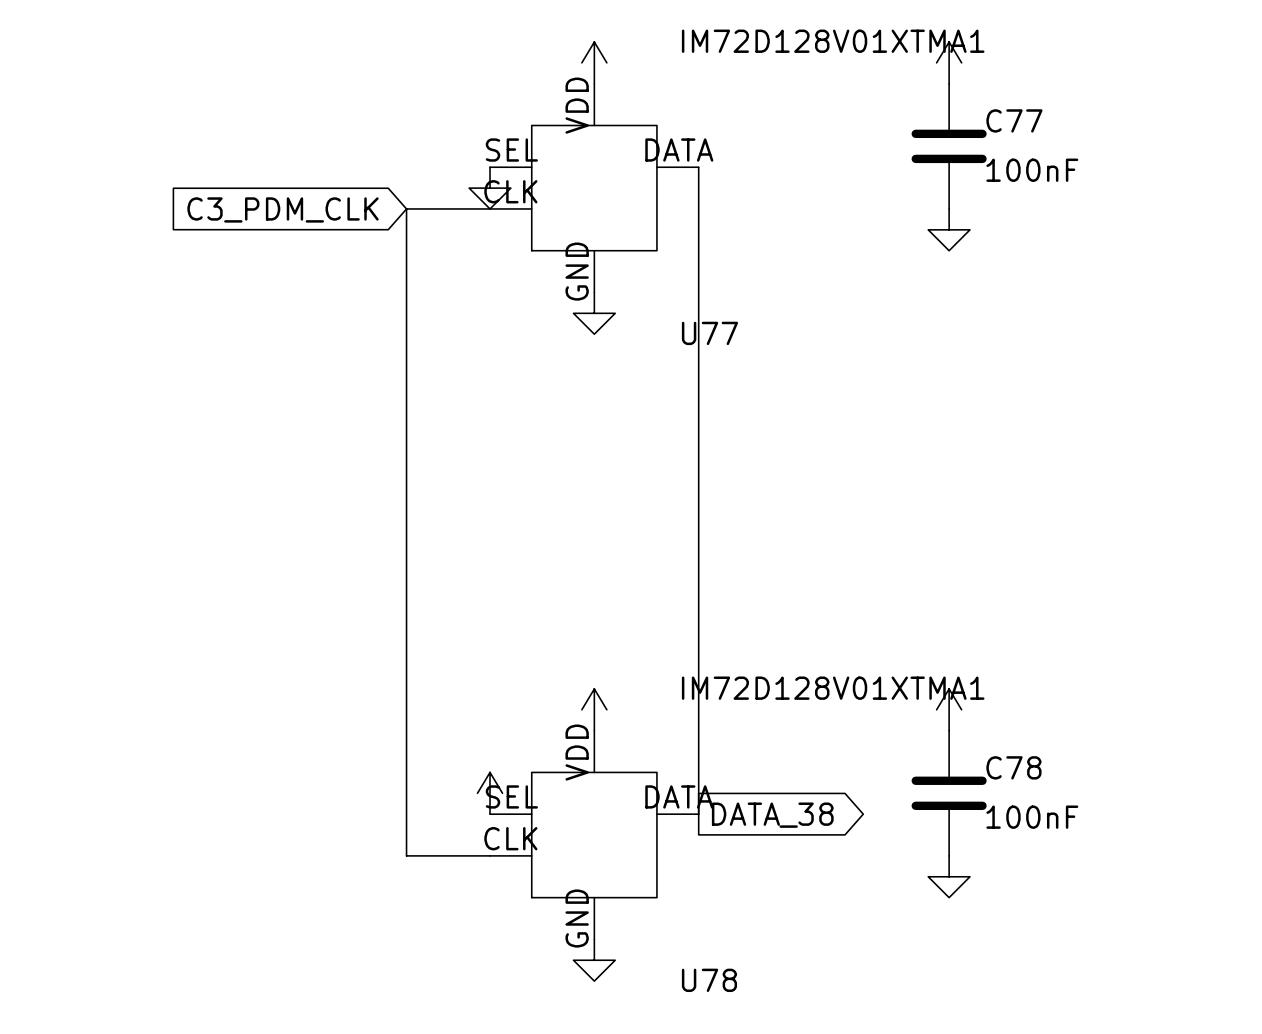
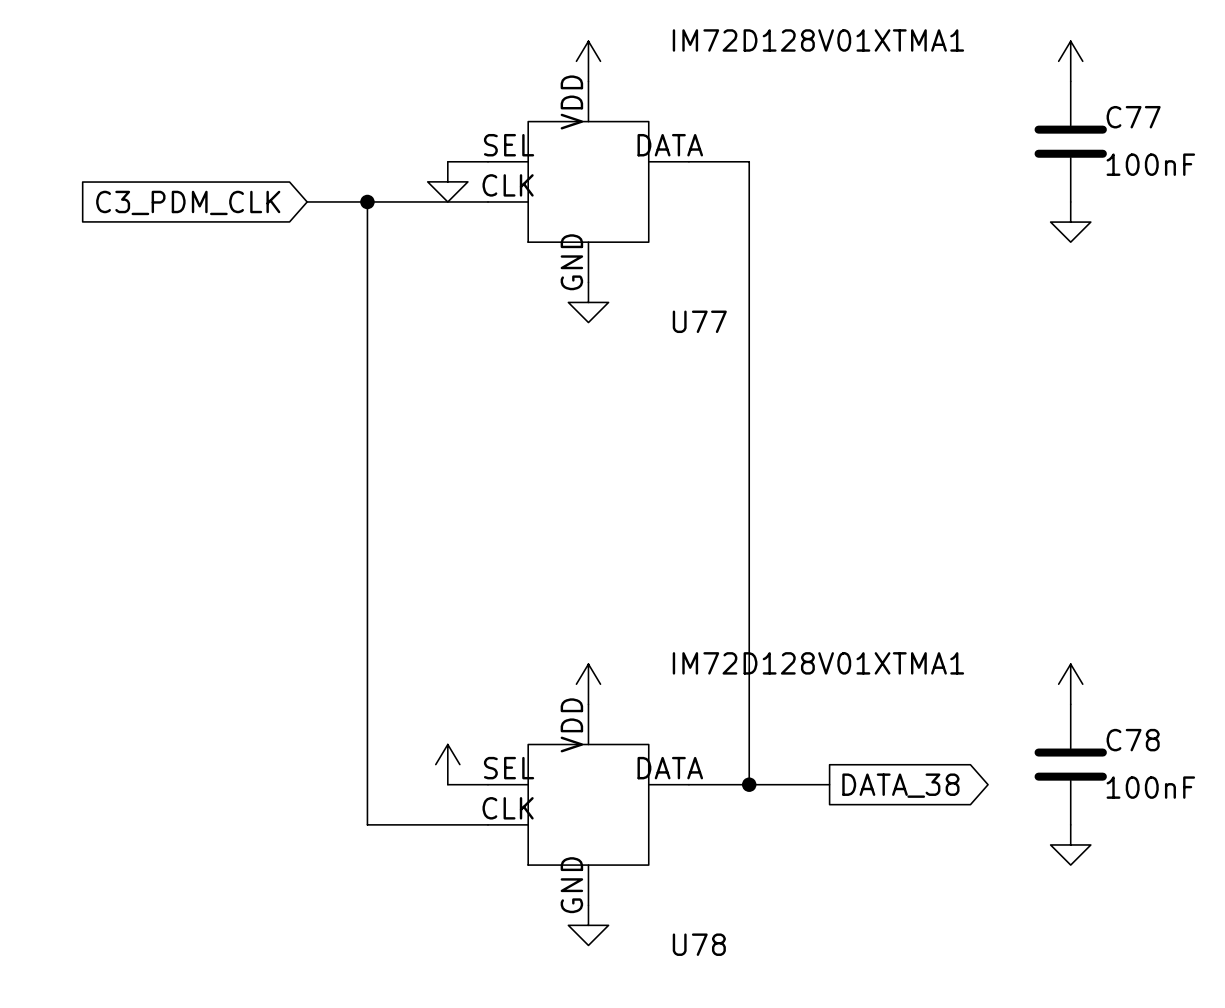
power symbol position: (949, 62) -> (1070, 61)
C77 position: (949, 146) -> (1070, 141)
wire: none -> (447, 161) (488, 161)
wire: (698, 167) (698, 814) -> (688, 161) (749, 161) (749, 784)
power symbol position: (490, 188) -> (447, 181)
wire: none -> (307, 201) (407, 201)
junction: none -> (367, 201)
wire: (406, 208) (406, 855) -> (367, 201) (367, 824) (407, 824)
global label position: C3_PDM_CLK (283, 209) -> C3_PDM_CLK (188, 202)
power symbol position: (949, 229) -> (1070, 222)
power symbol position: (949, 709) -> (1070, 684)
power symbol position: (490, 793) -> (447, 764)
C78 position: (949, 793) -> (1070, 764)
wire: none -> (447, 784) (488, 784)
wire: none -> (688, 784) (829, 784)
junction: none -> (749, 784)
global label position: DATA_38 (772, 815) -> DATA_38 (900, 785)
power symbol position: (949, 876) -> (1070, 844)

